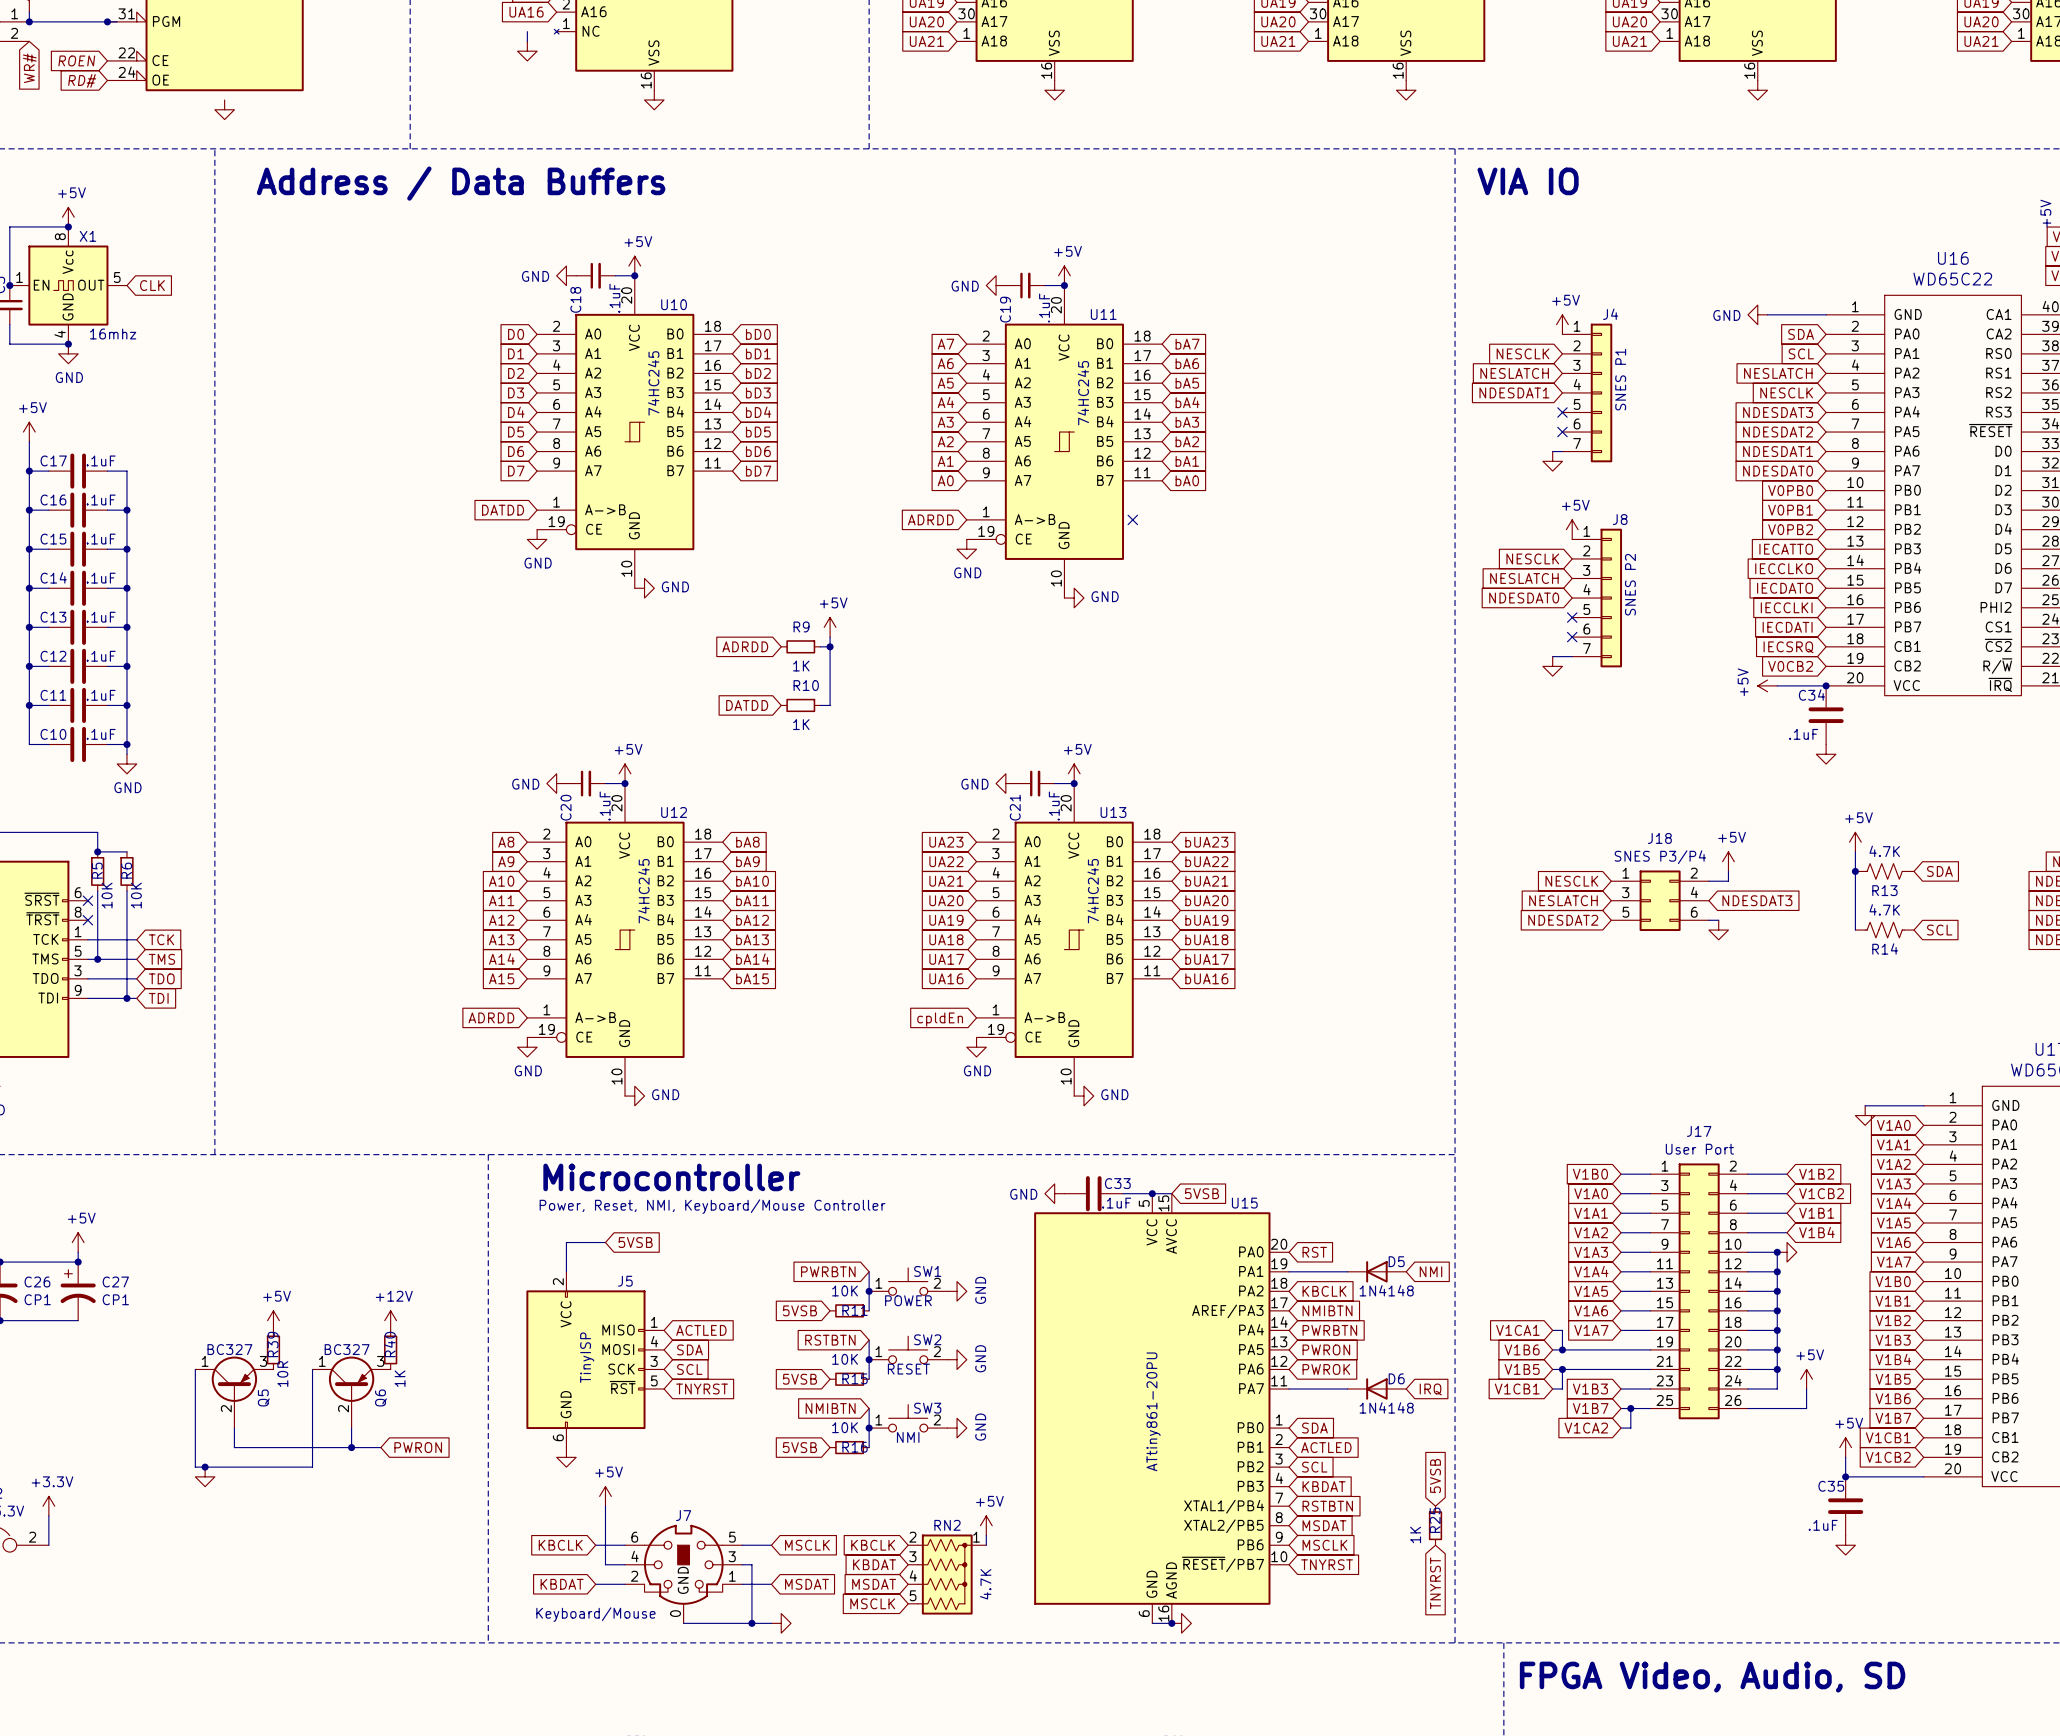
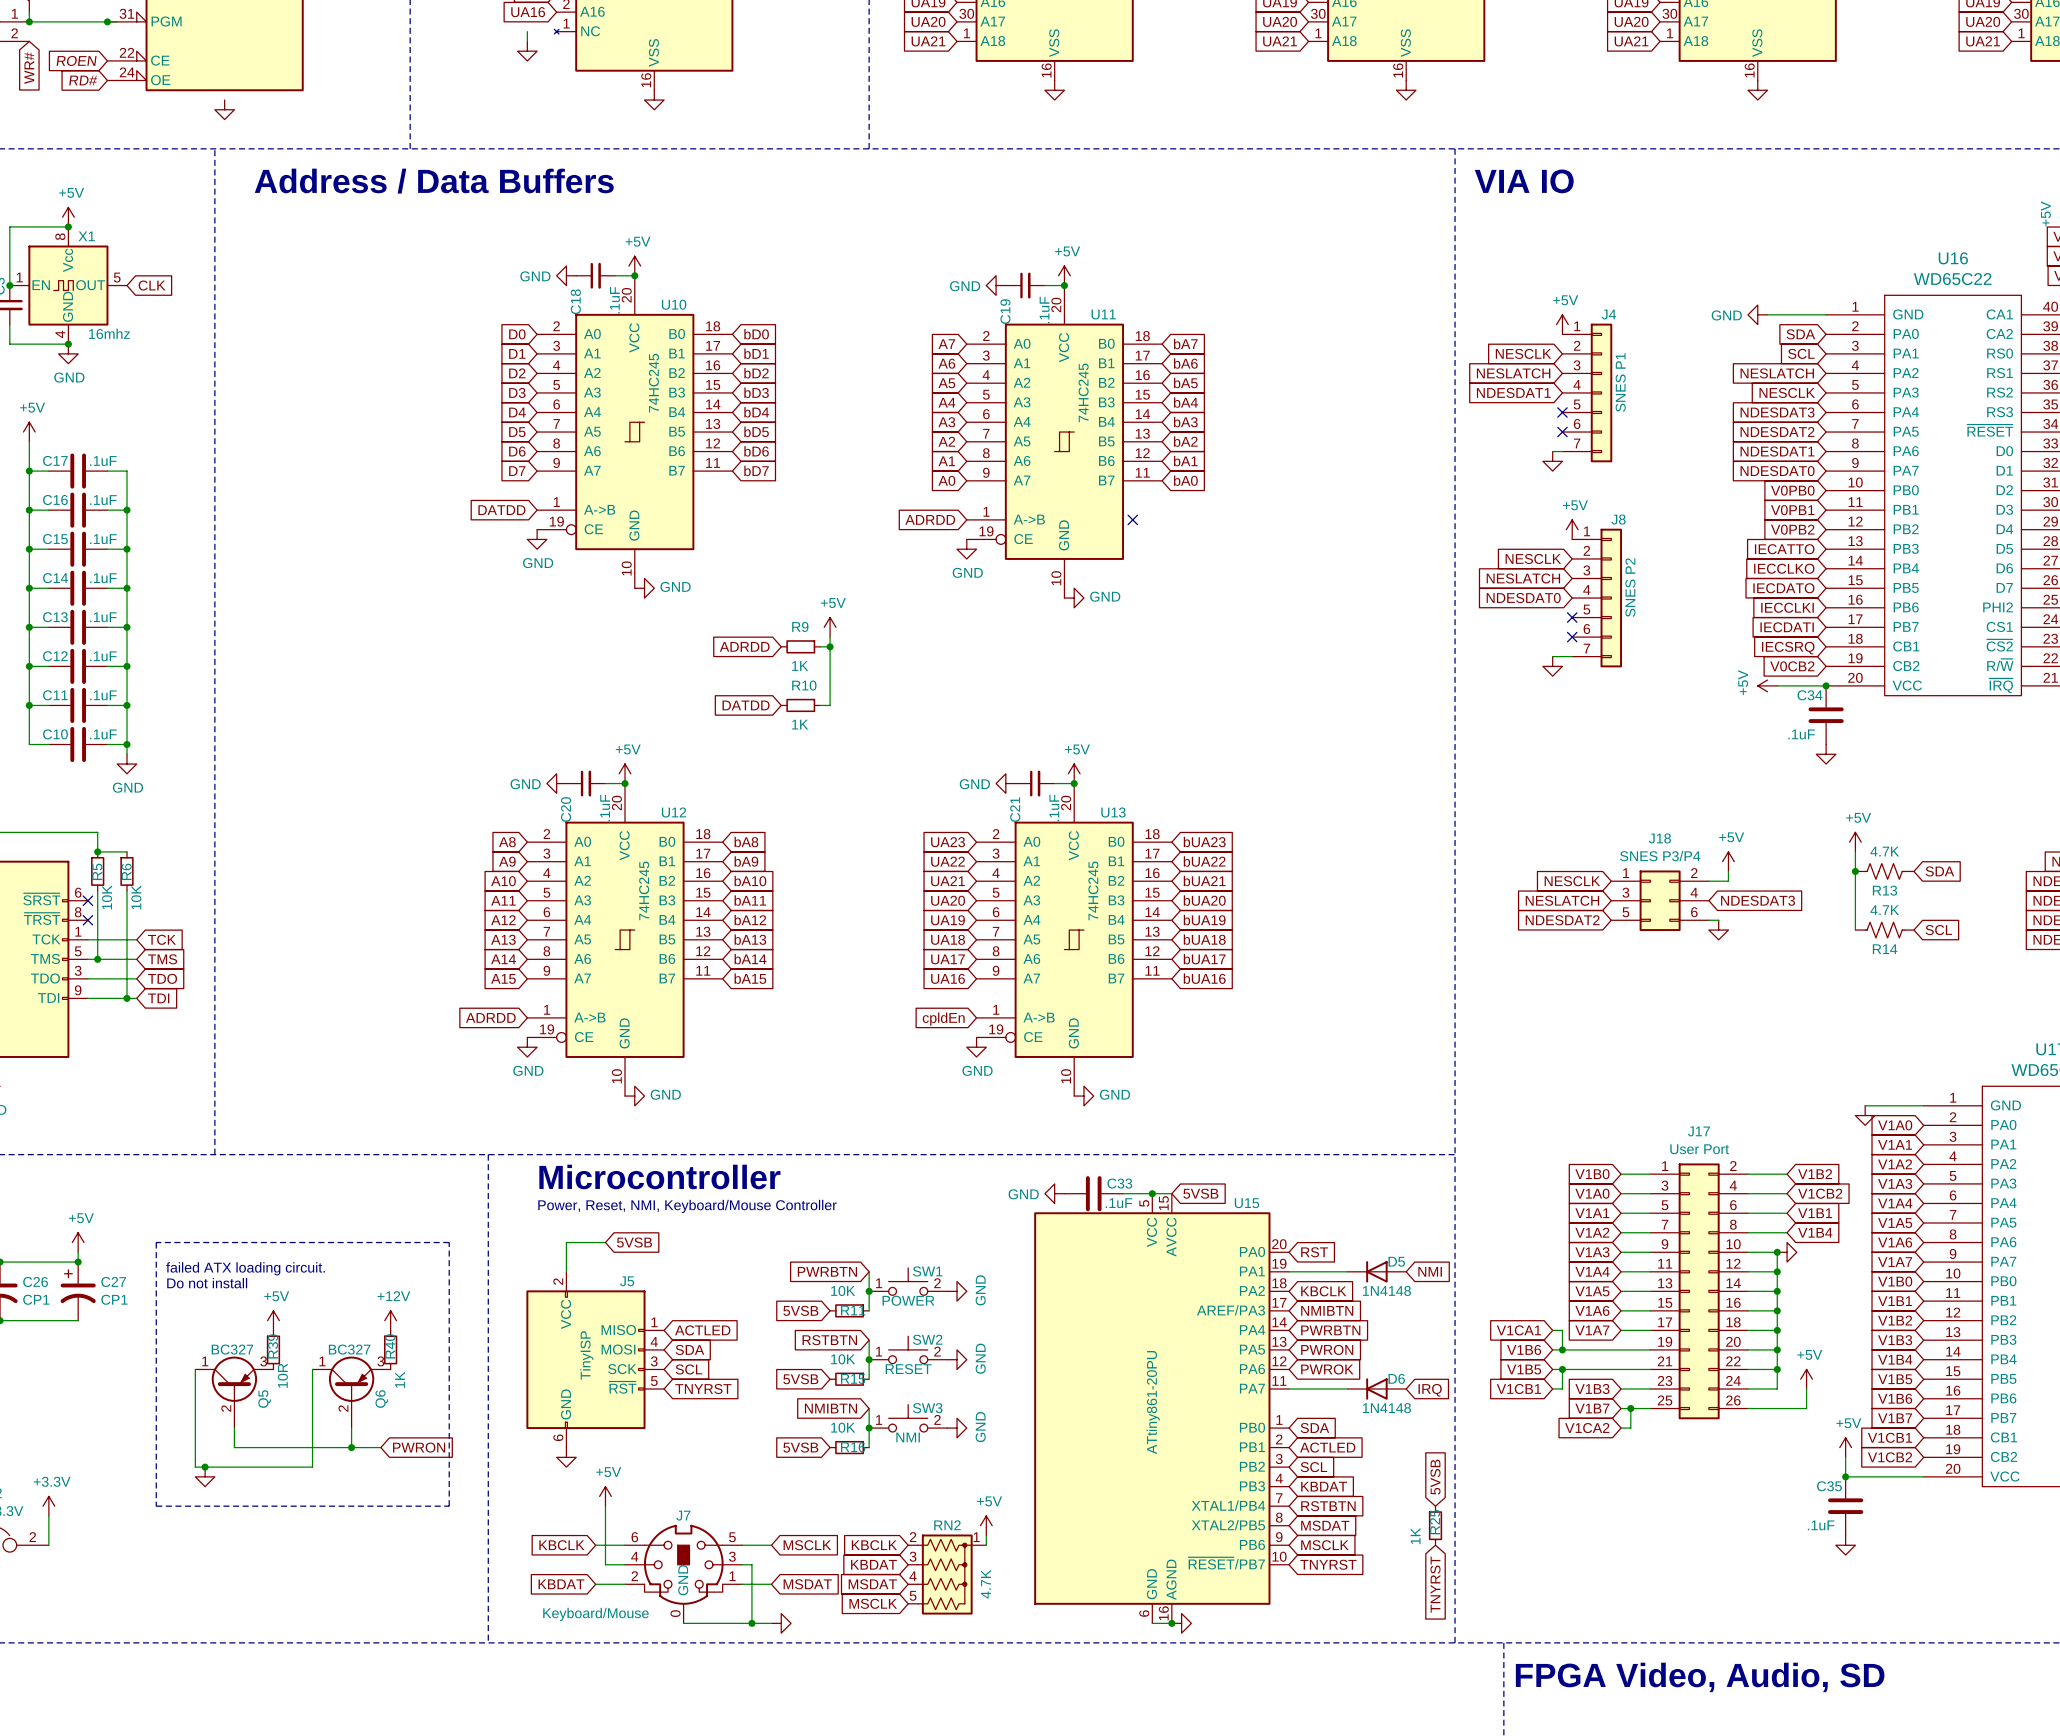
line: none -> (156, 1242) (449, 1242) (449, 1506) (156, 1506) (156, 1242)
text: none -> failed ATX loading circuit. (245, 1268)
text: none -> Do not install (207, 1283)

